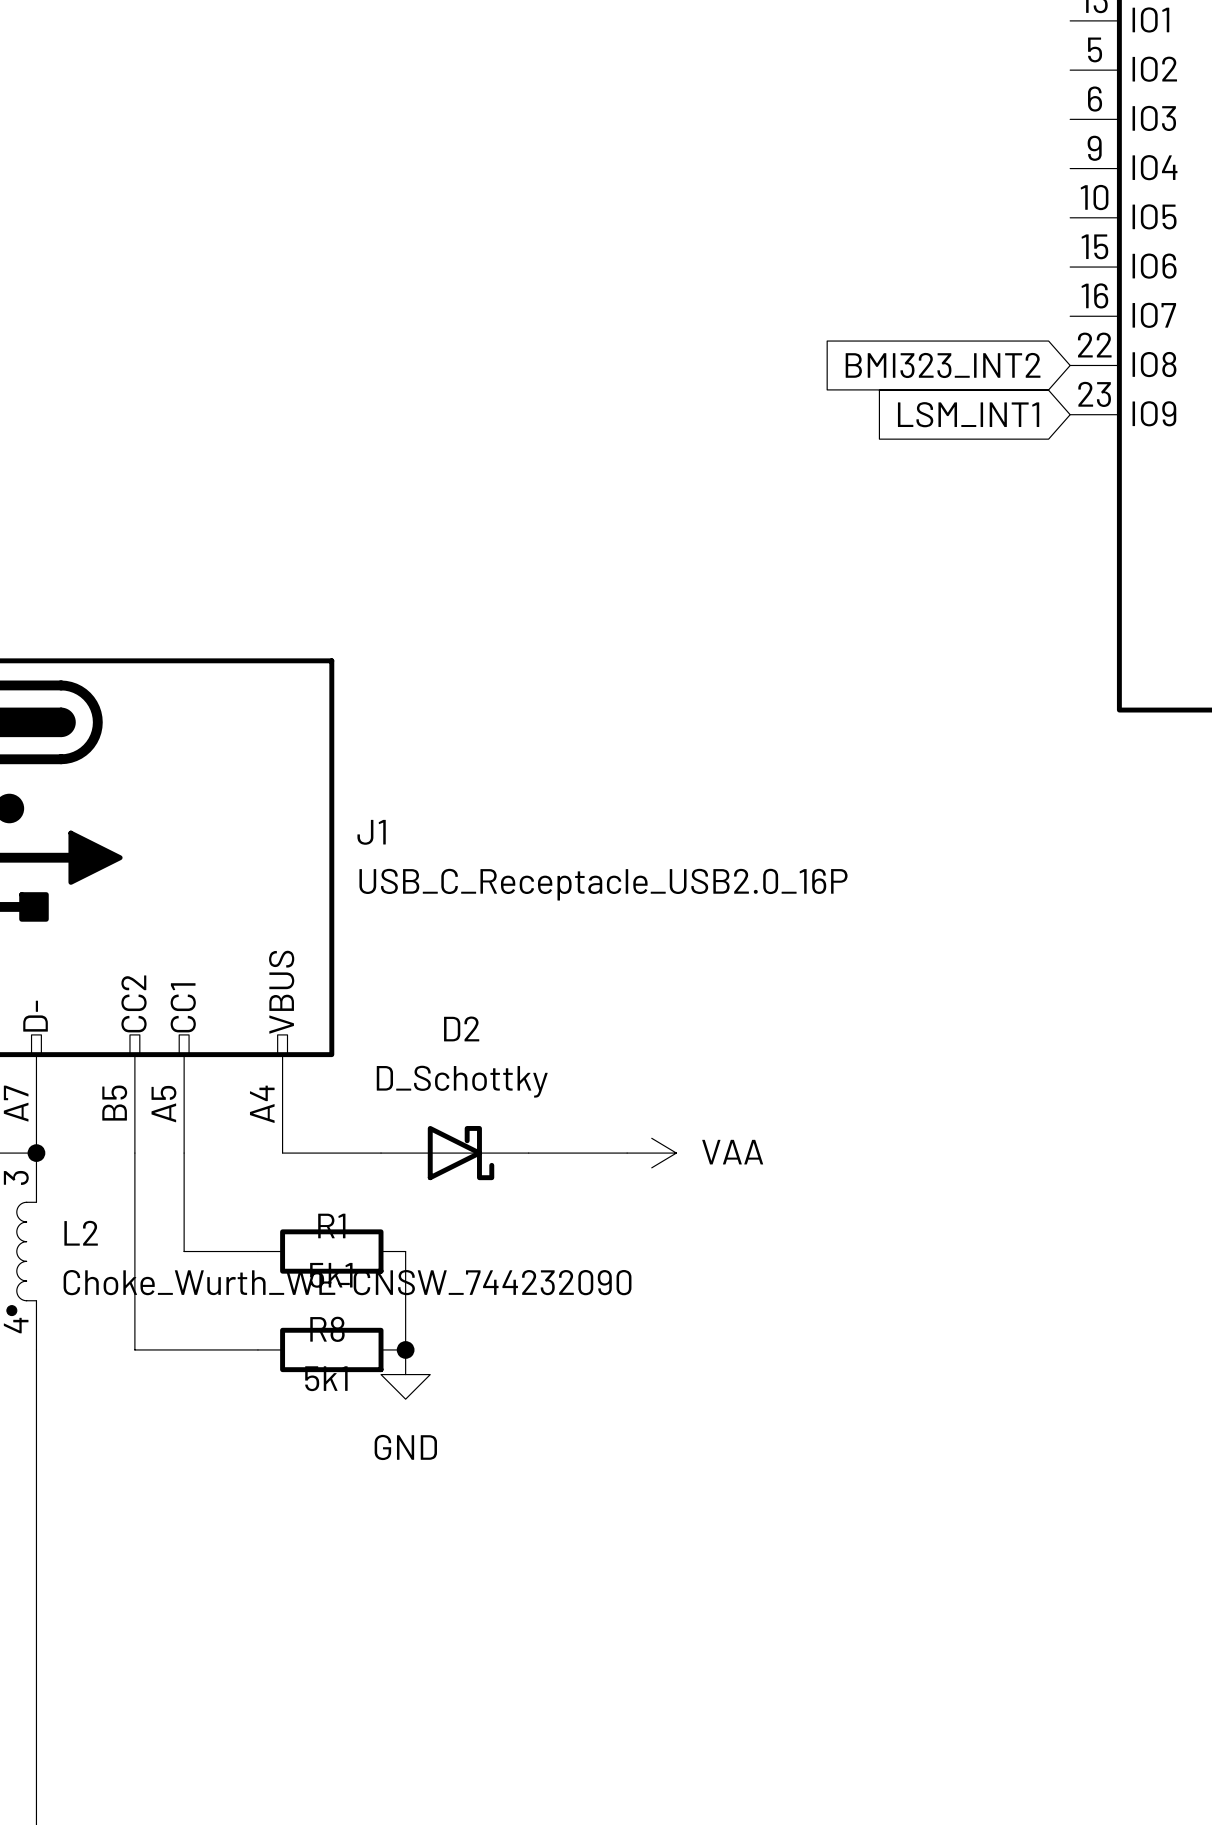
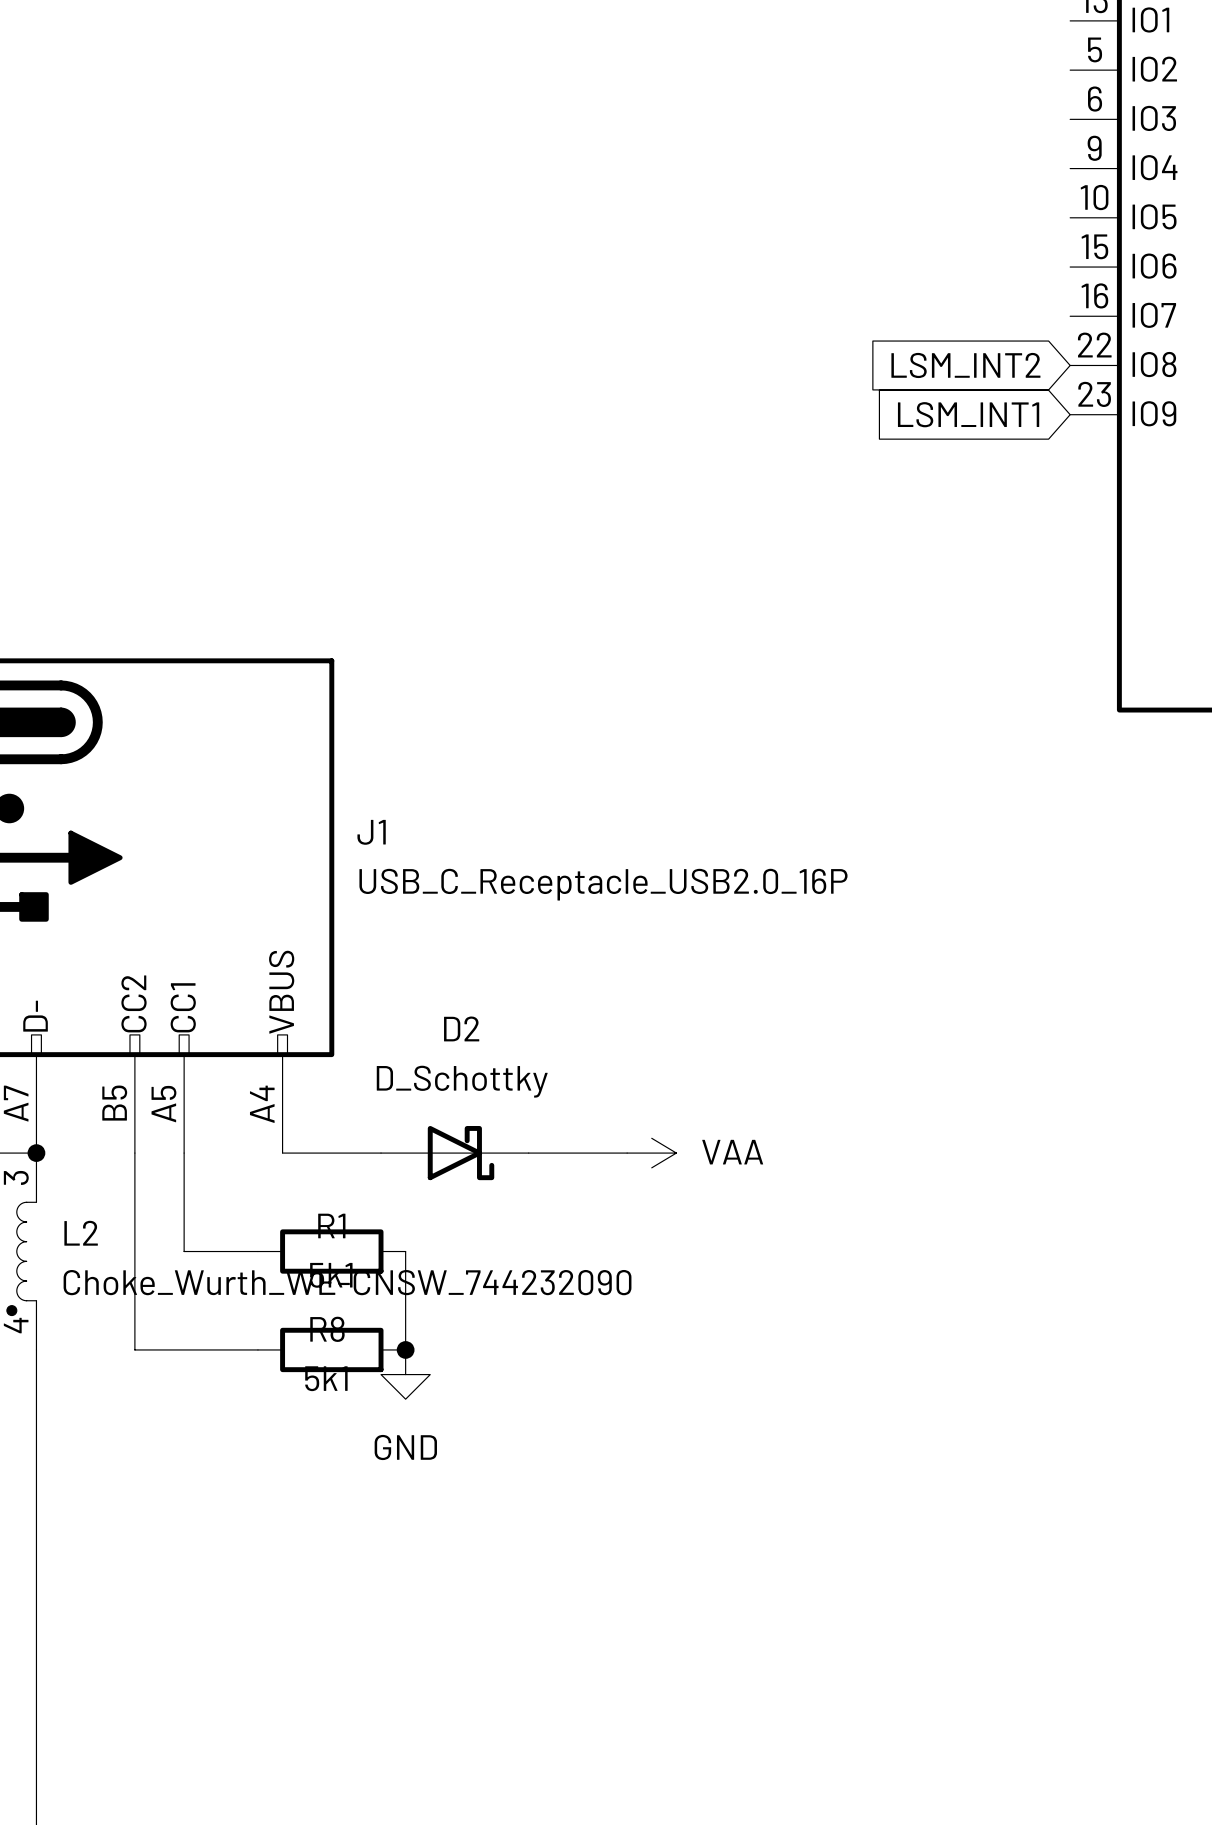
global label: BMI323_INT2 (943, 365) -> LSM_INT2 (965, 365)

